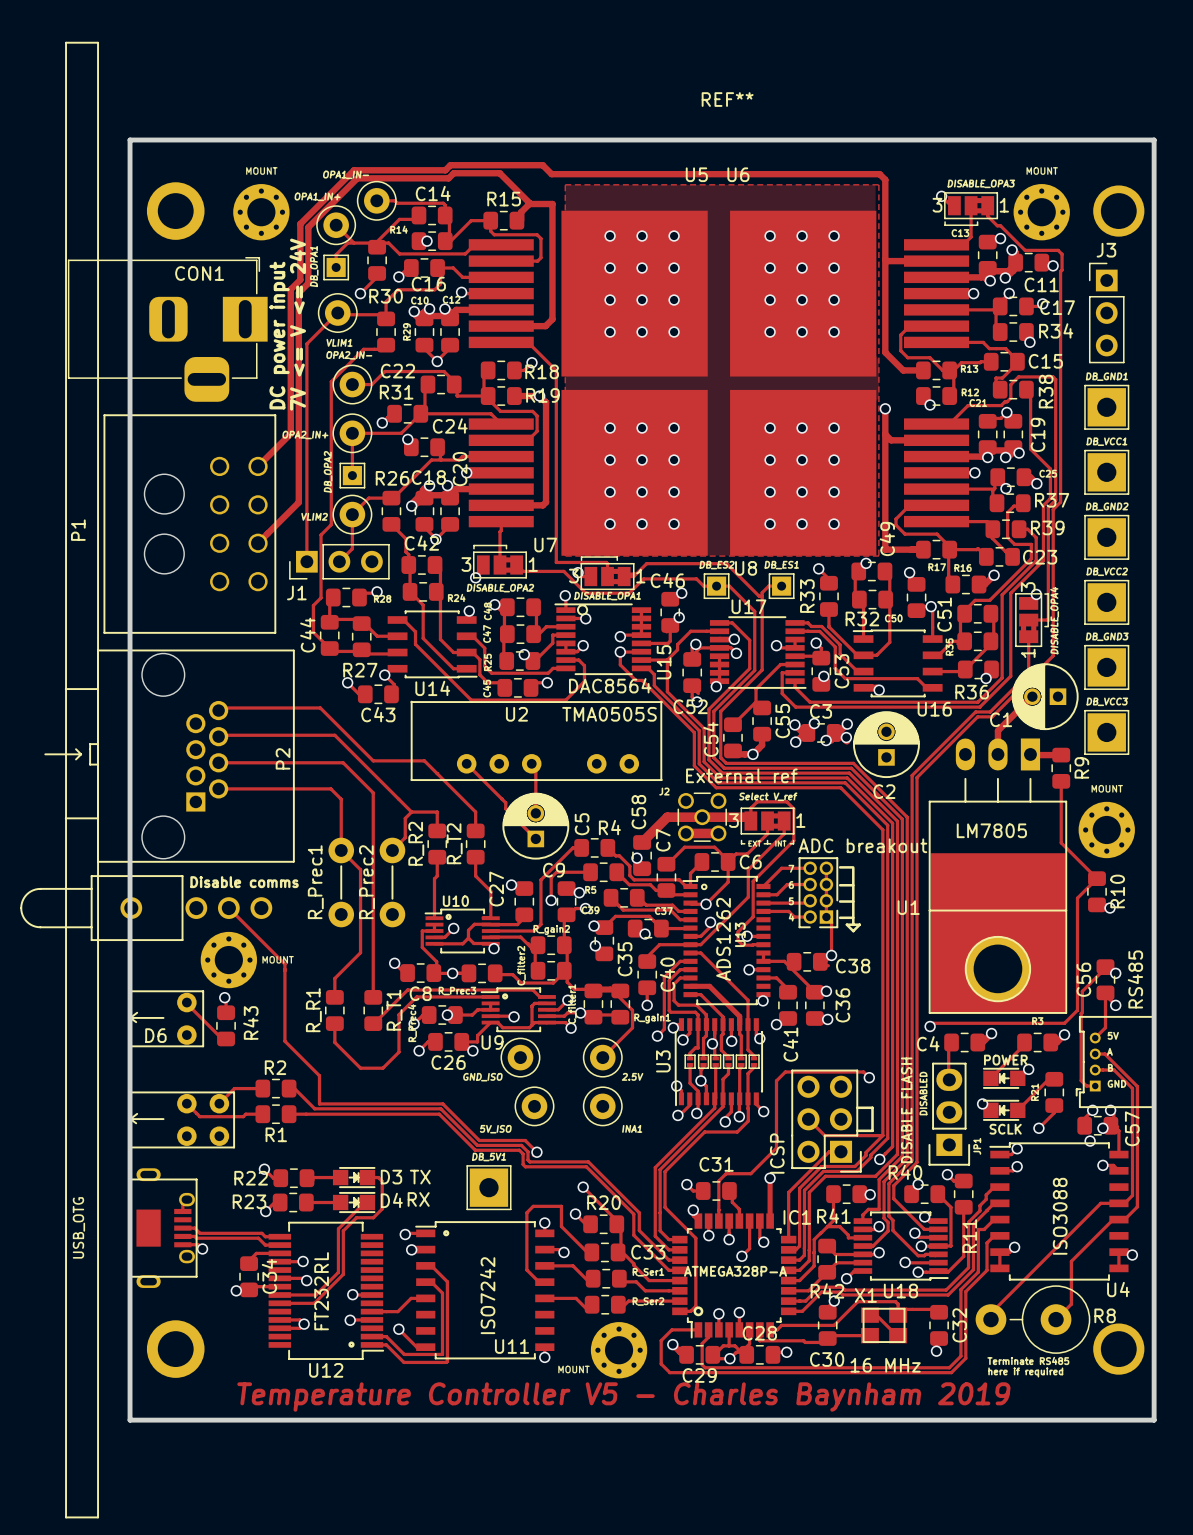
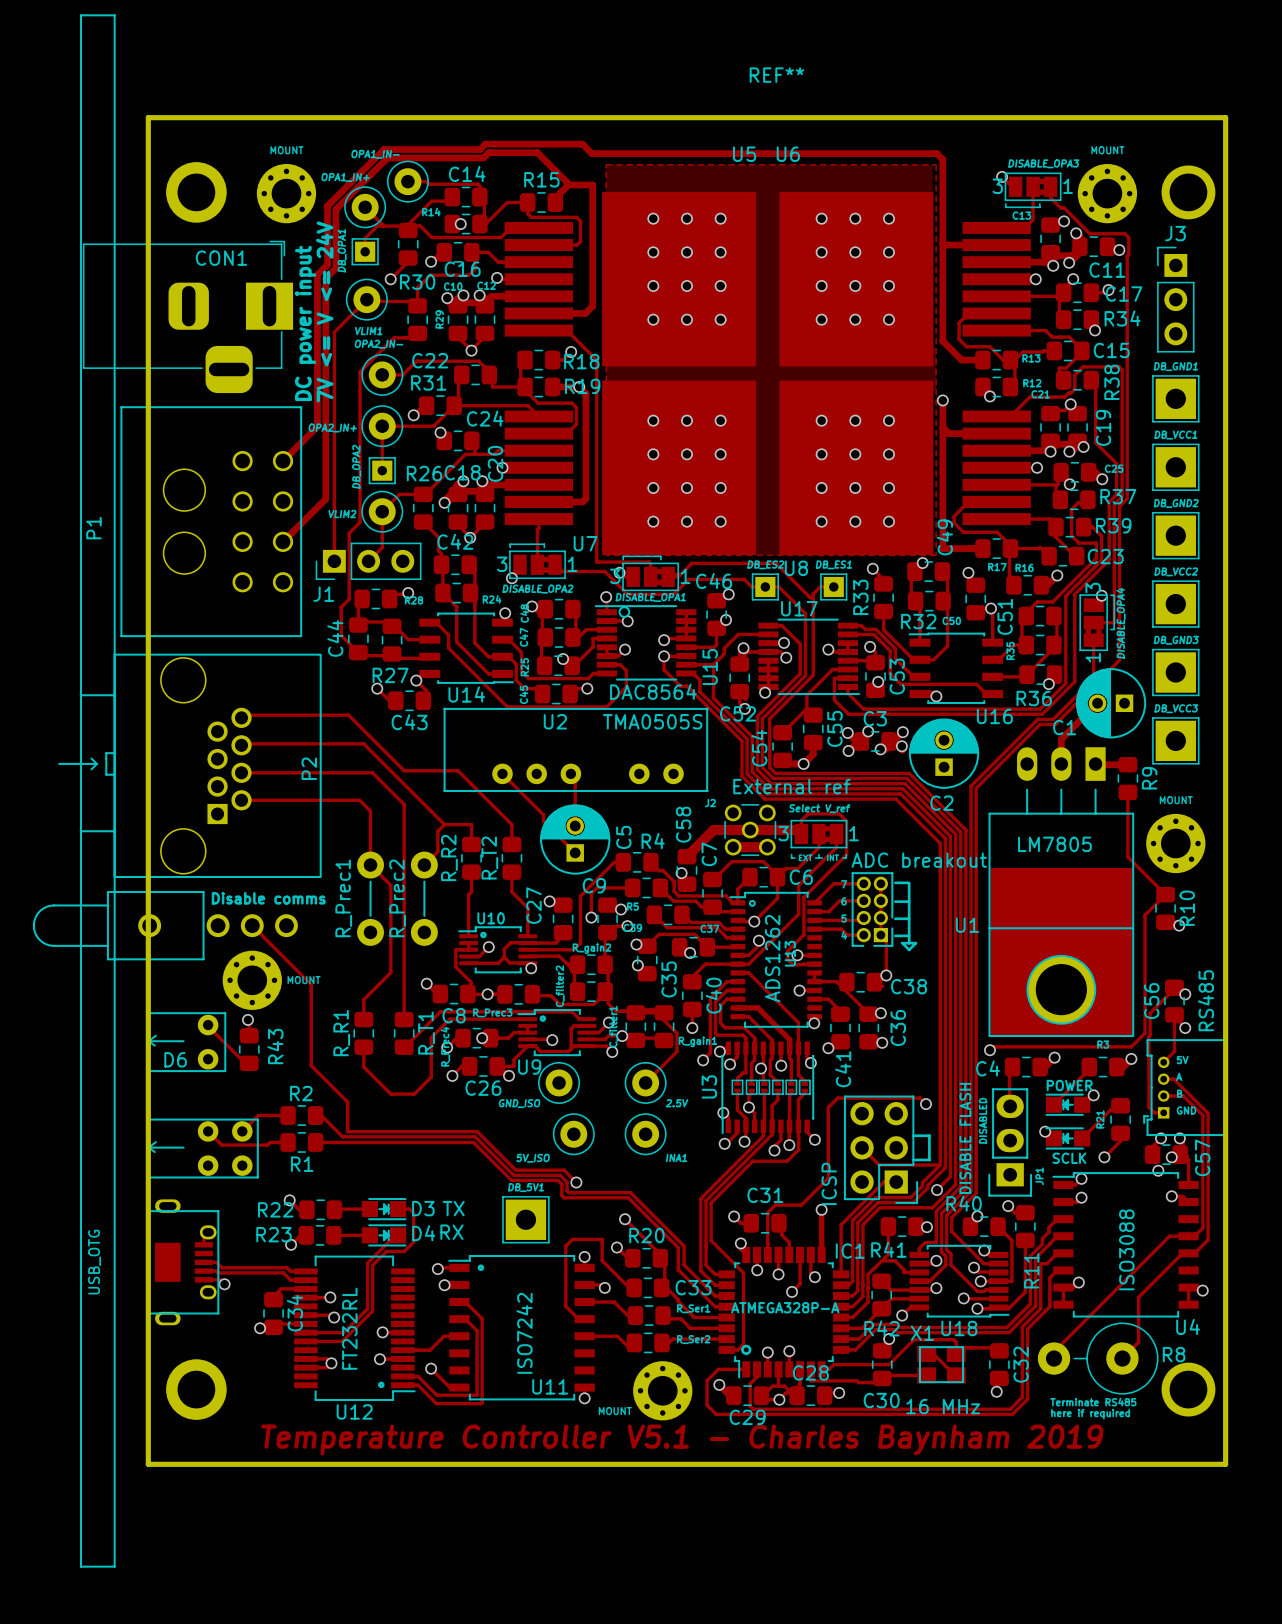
text: Temperature Controller V5 - Charles Baynham 2019 (623, 1397) -> Temperature Controller V5.1 - Charles Baynham 2019 (682, 1439)

